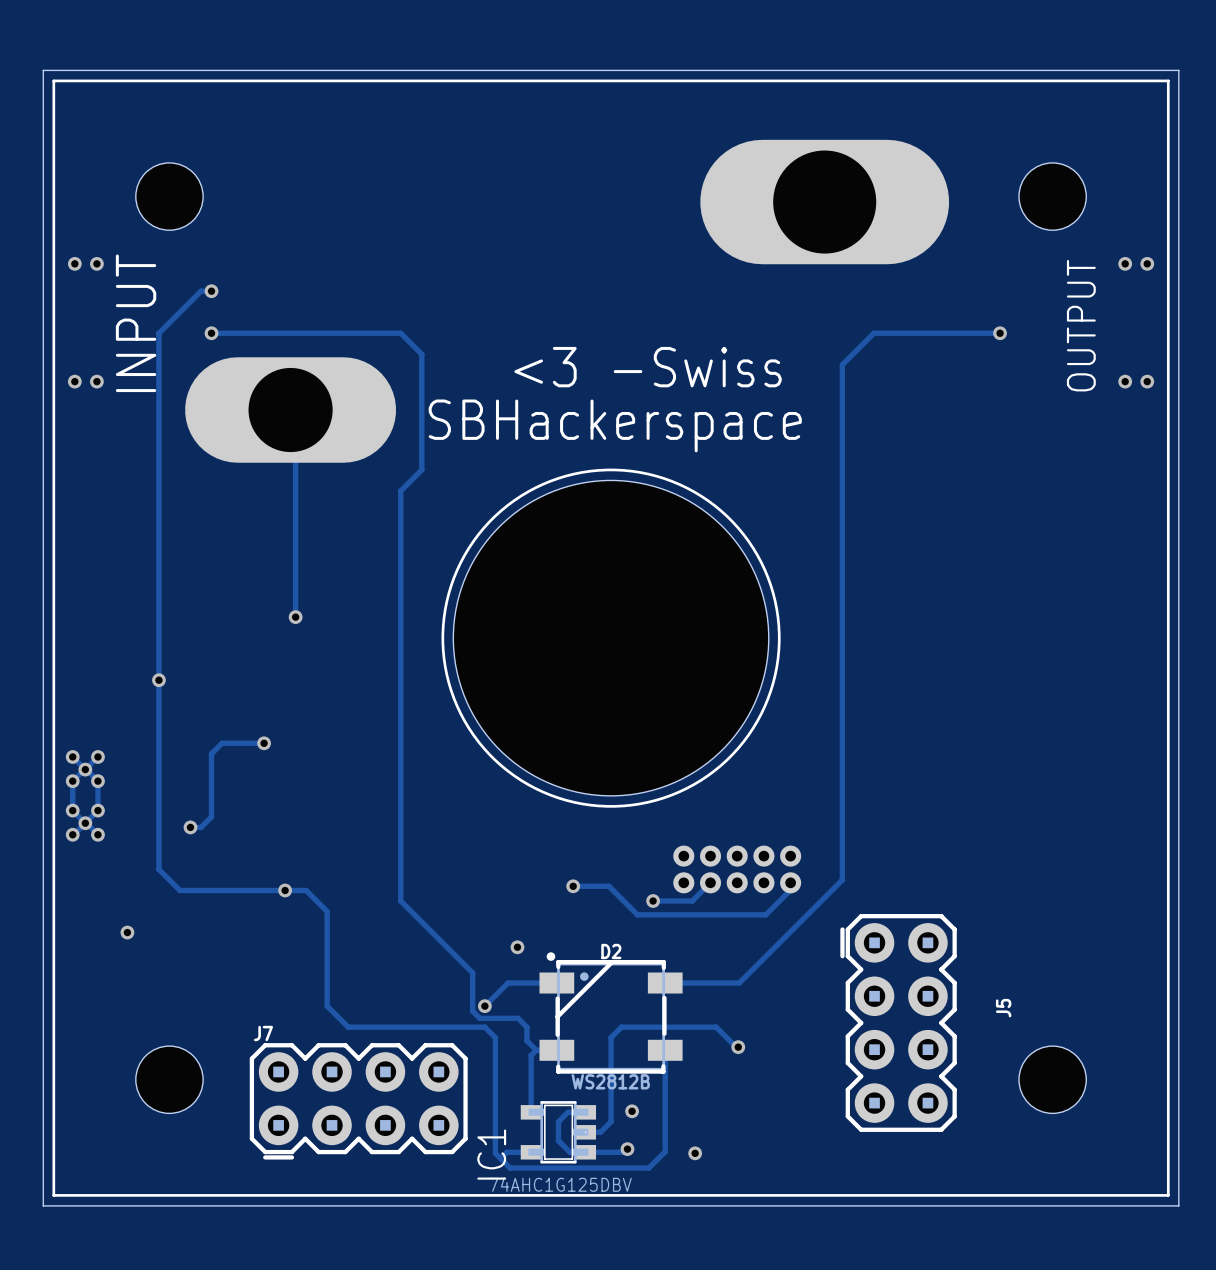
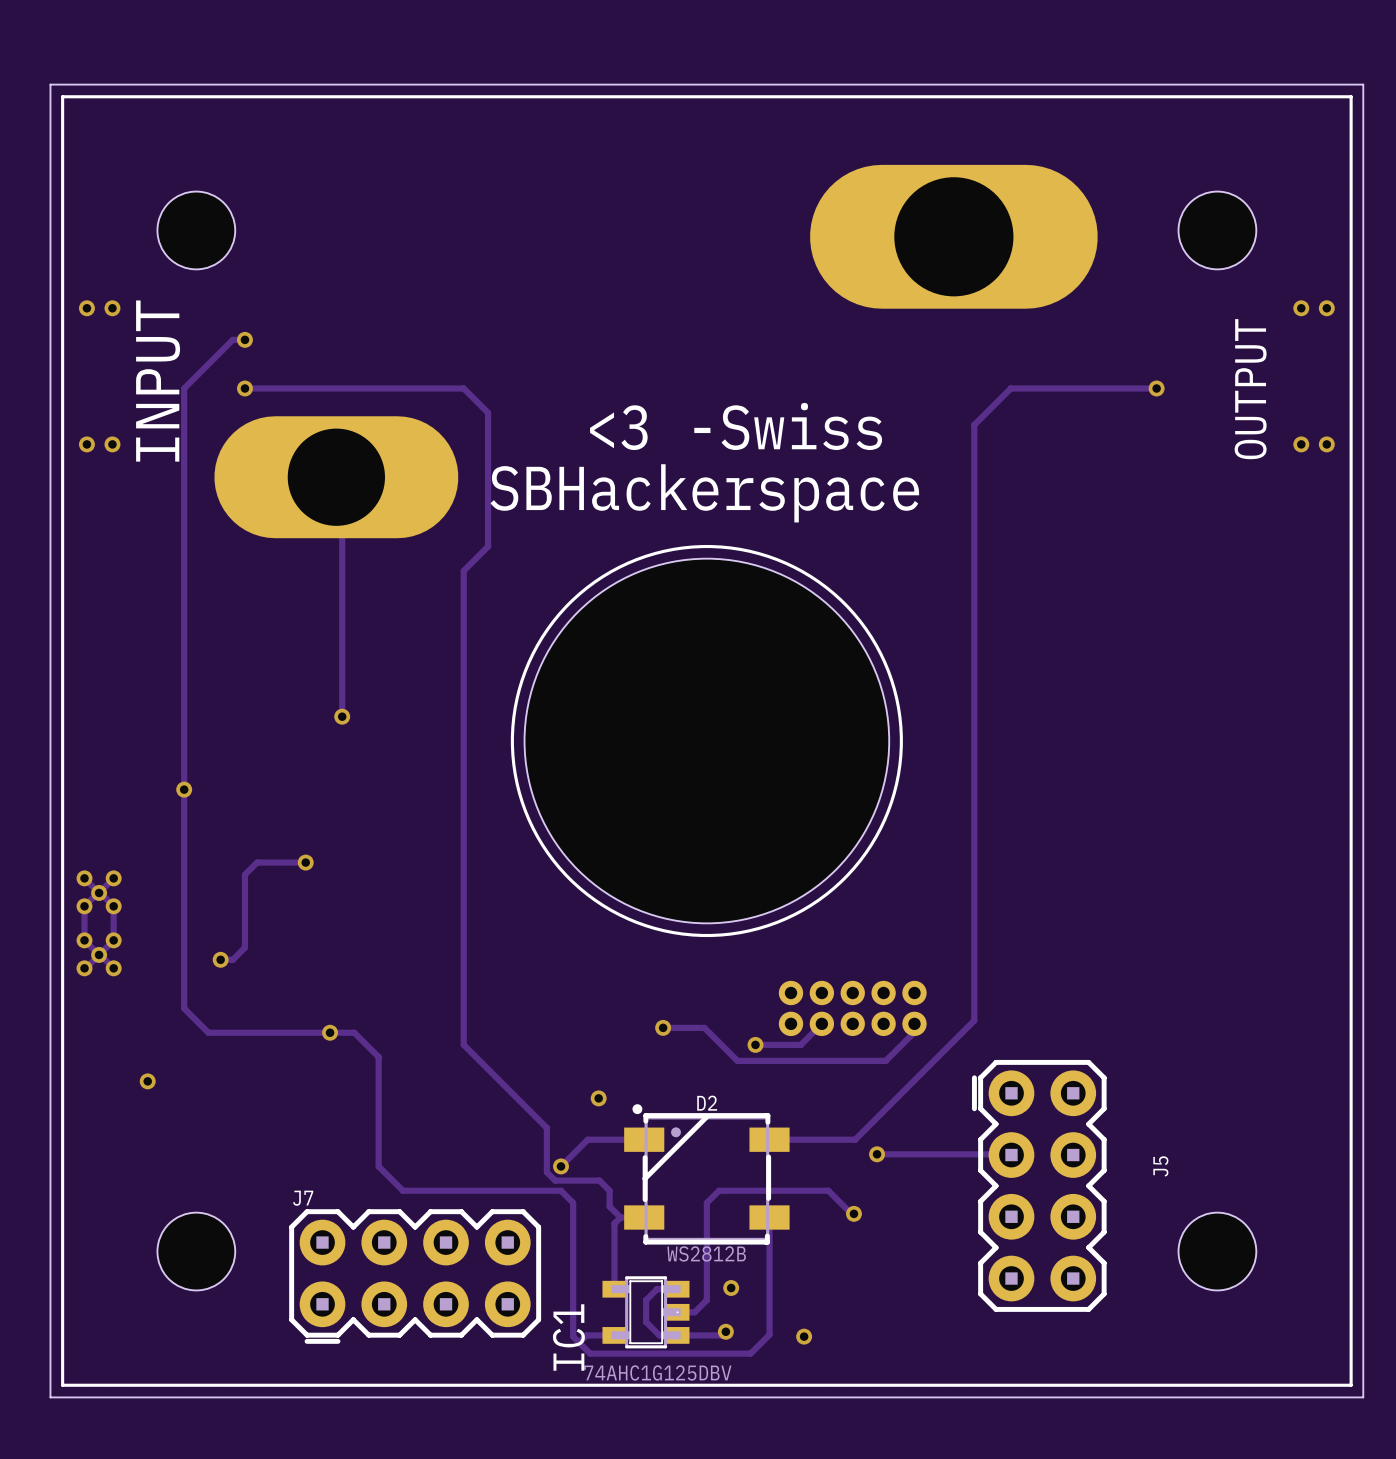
track: none -> (877, 1154) (1011, 1155)
via: none -> (877, 1154)

